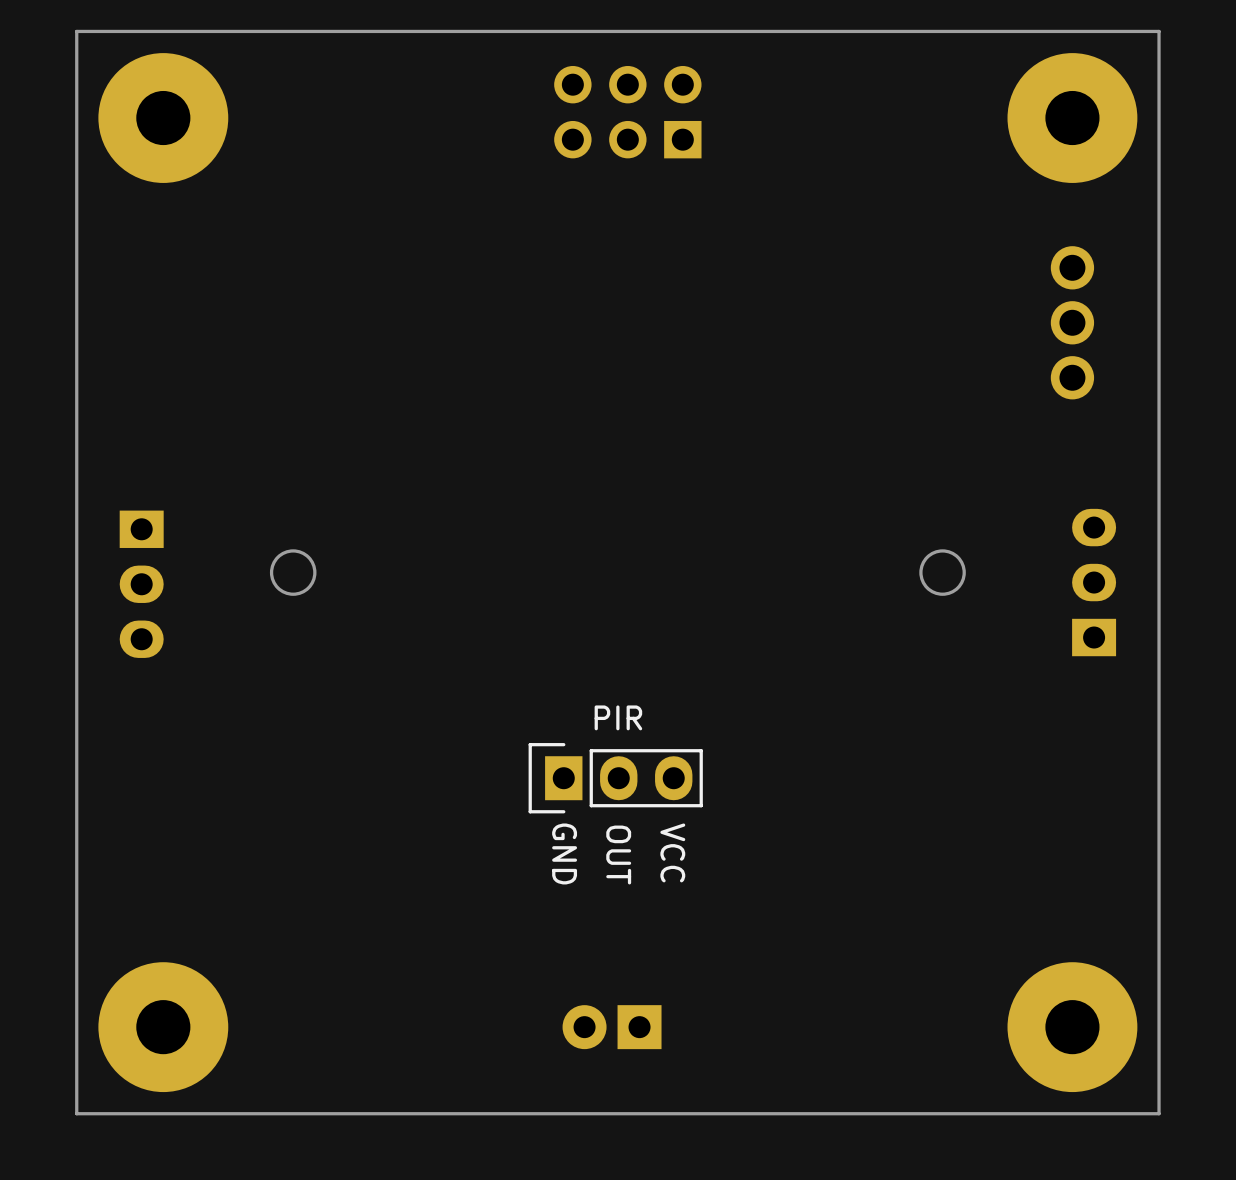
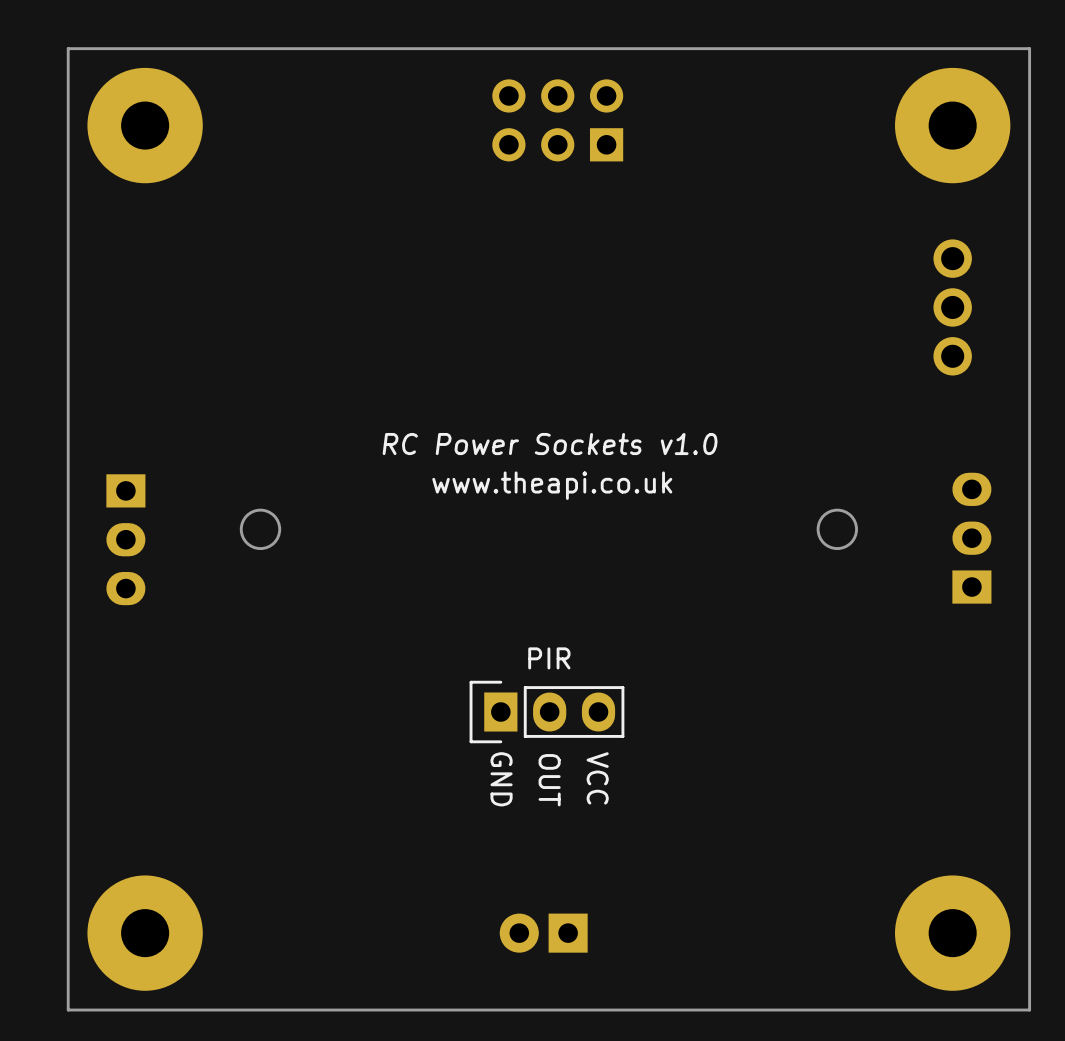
text: none -> RC Power Sockets v1.0 (550, 444)
text: none -> www.theapi.co.uk (552, 485)

